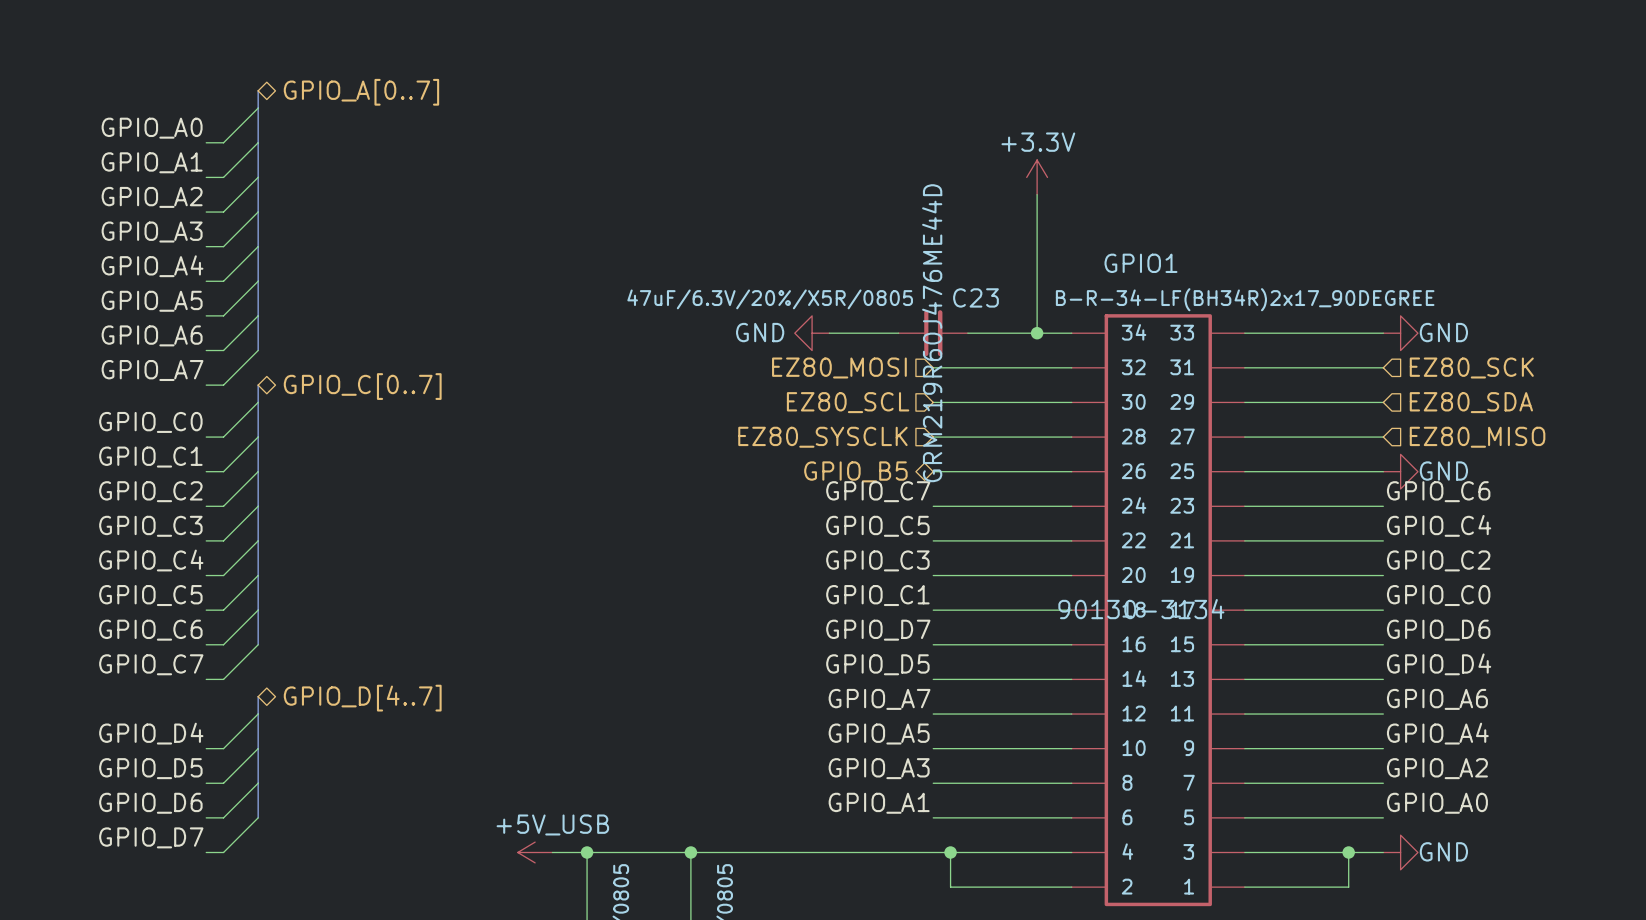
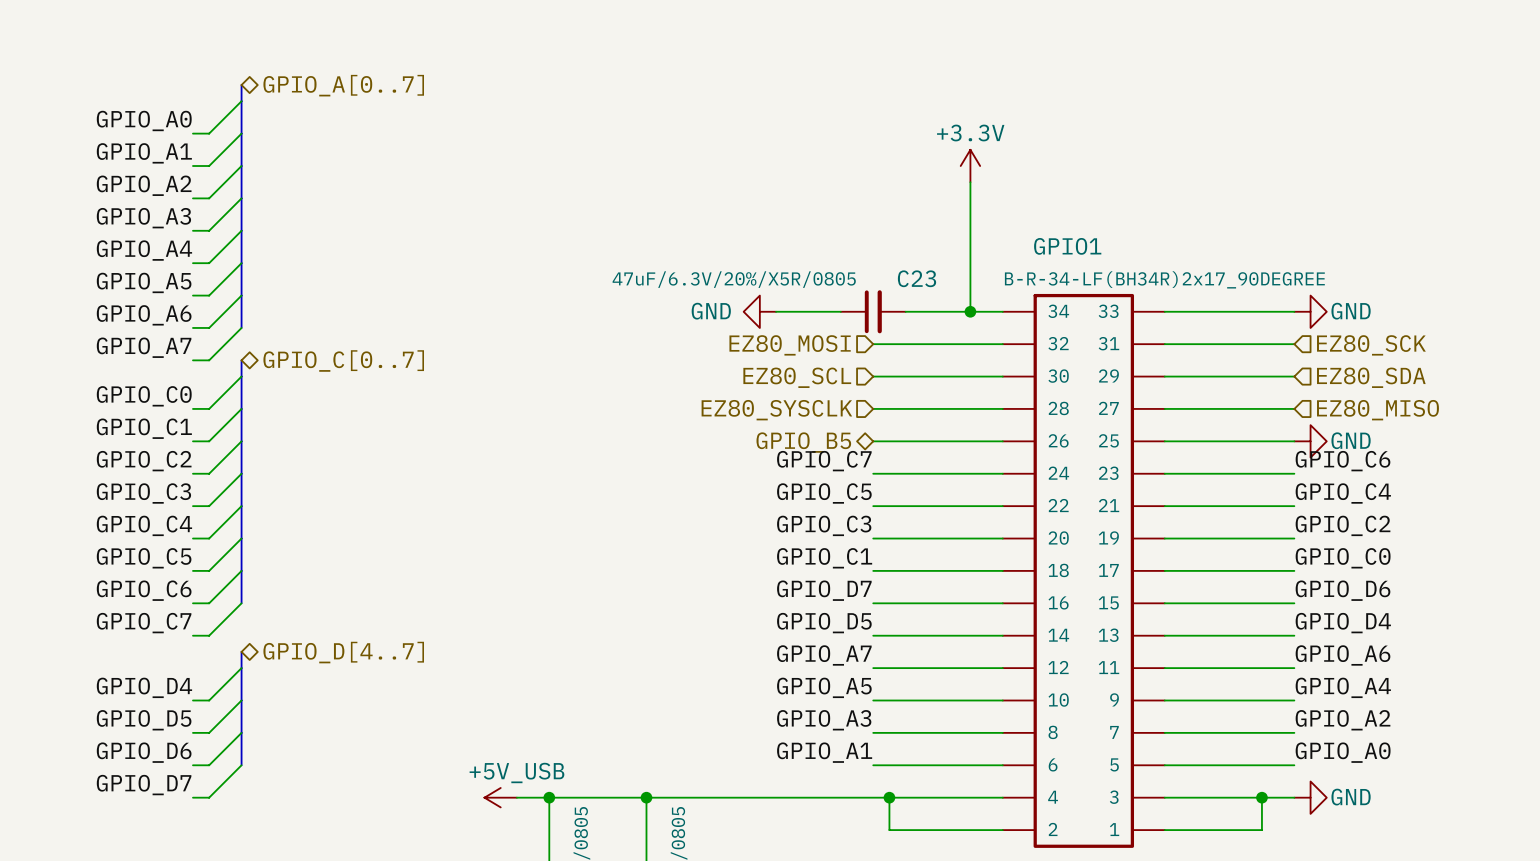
C23 text: GRM219R60J476ME44D (932, 333) -> none
GPIO1 text: 90130-3134 (1141, 609) -> none

